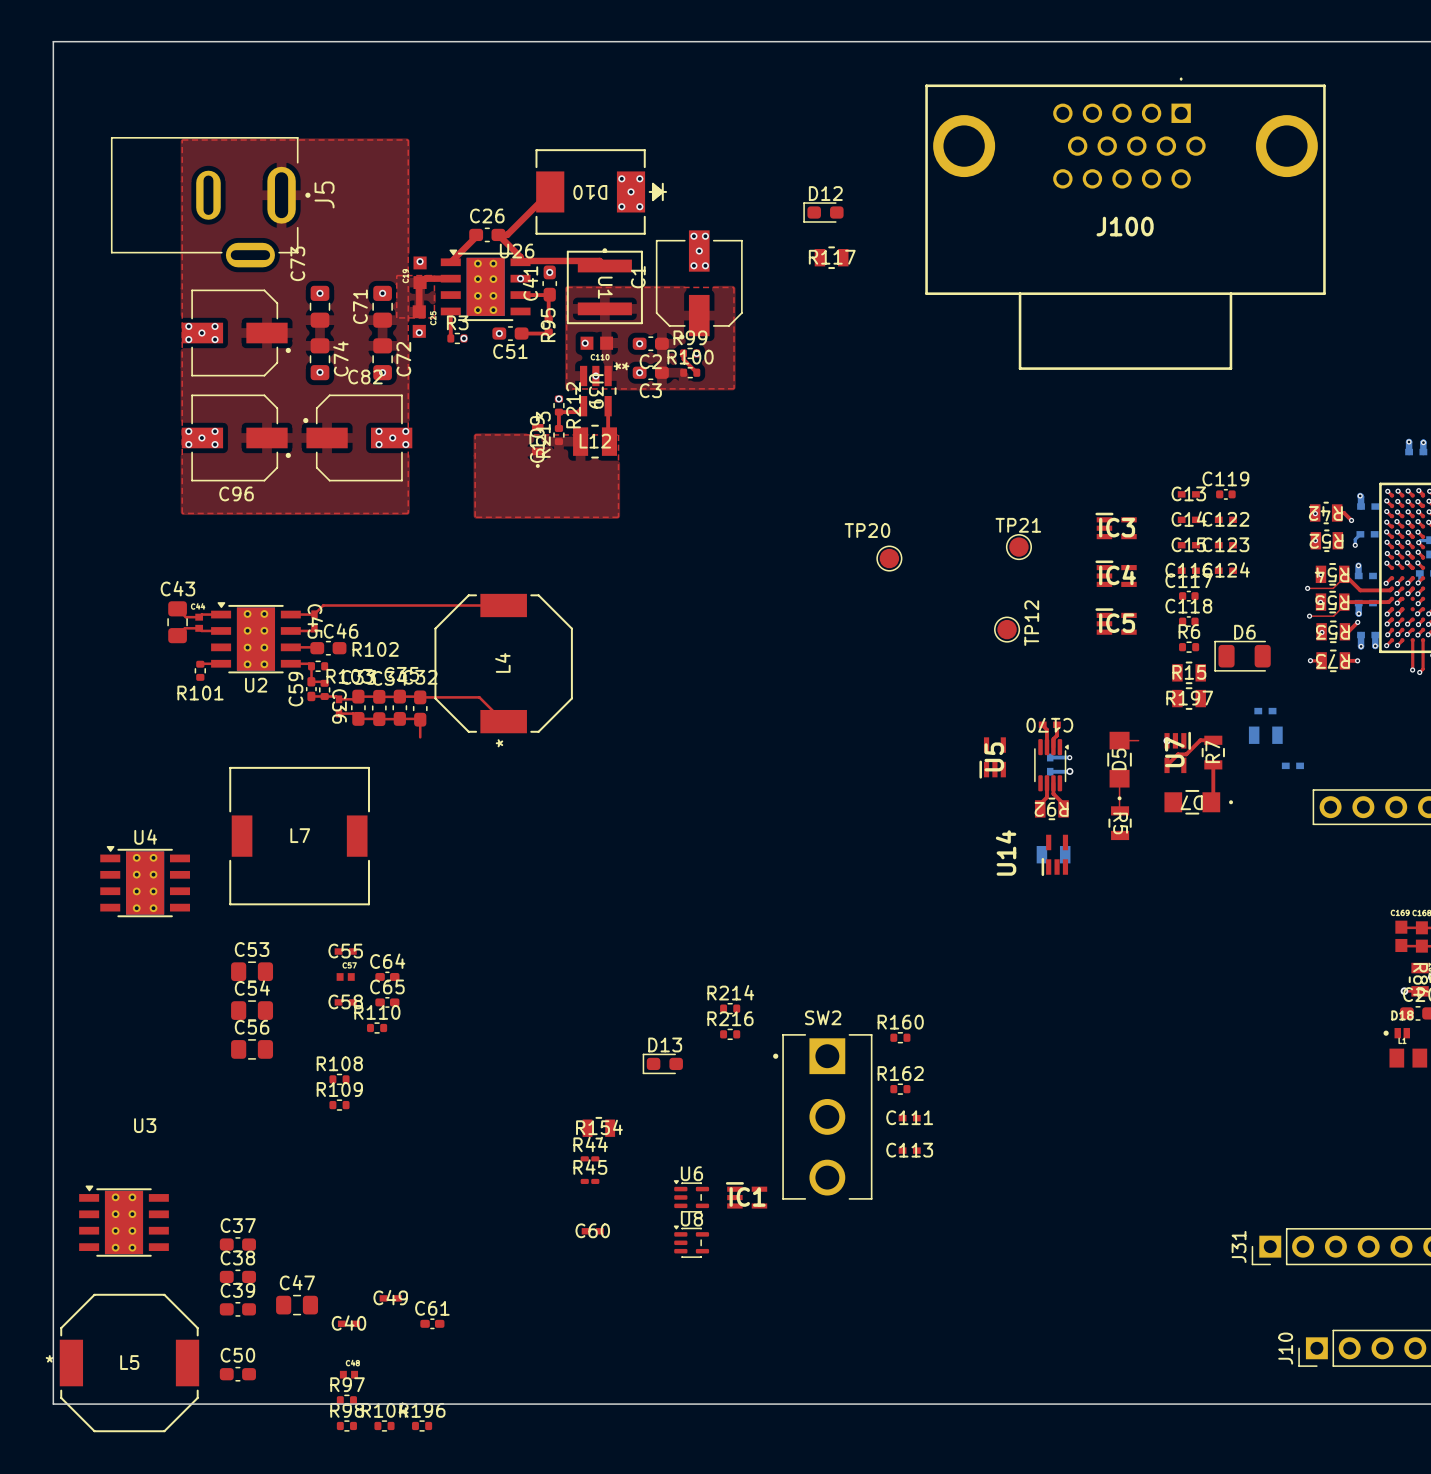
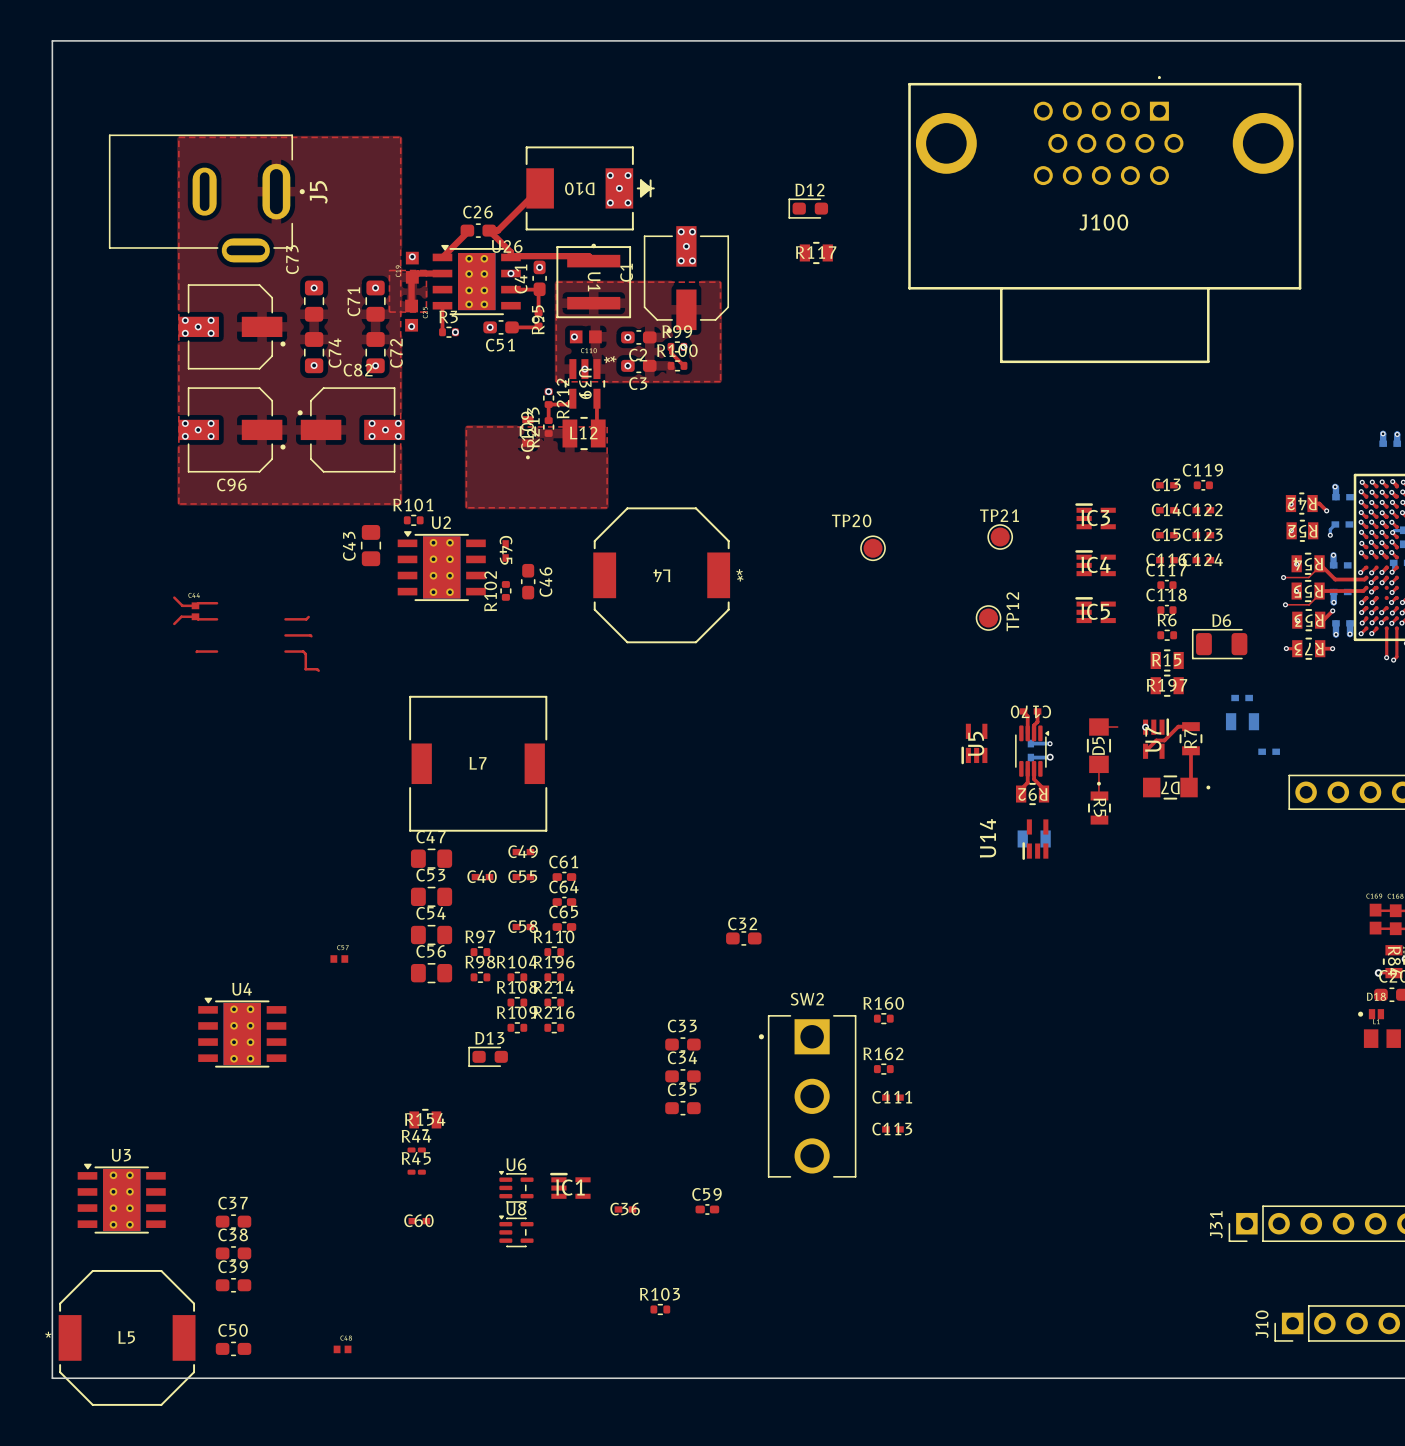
C43 name rotation: 0° (177, 588) -> 90° counterclockwise (349, 546)
top track: (503, 605) (323, 605) (314, 614) (290, 614) -> none
C45 position: (314, 621) -> (505, 550)
C43 position: (177, 622) -> (371, 545)
U2 position: (255, 637) -> (441, 566)
C46 rotation: 0° (328, 648) -> 90° clockwise (528, 581)
C46 position: (328, 648) -> (528, 581)
R102 name position: R102 (375, 649) -> R102 (490, 591)
L4 rotation: 0° (503, 663) -> 90° counterclockwise (661, 575)
L4 position: (503, 663) -> (661, 575)
R102 rotation: 0° (318, 666) -> 90° clockwise (505, 590)
R102 position: (318, 666) -> (505, 590)
R101 rotation: 0° (200, 670) -> 90° clockwise (413, 520)
R101 position: (200, 670) -> (413, 520)
U2 name position: U2 (256, 685) -> U2 (441, 522)
C59 rotation: 0° (311, 689) -> 90° clockwise (707, 1209)
C59 position: (311, 689) -> (707, 1209)
R103 rotation: 0° (324, 689) -> 90° clockwise (660, 1309)
R103 position: (324, 689) -> (660, 1309)
R101 name position: R101 (200, 693) -> R101 (413, 505)
top track: (311, 696) (336, 696) (339, 699) (355, 699) (358, 696) (479, 697) (503, 721) -> none
C36 rotation: 0° (339, 706) -> 90° clockwise (625, 1209)
C36 position: (339, 706) -> (625, 1209)
C33 rotation: 0° (358, 707) -> 90° clockwise (682, 1044)
C33 position: (358, 707) -> (682, 1044)
C34 rotation: 0° (379, 707) -> 90° clockwise (682, 1076)
C34 position: (379, 707) -> (682, 1076)
C35 rotation: 0° (399, 707) -> 90° clockwise (682, 1108)
C35 position: (399, 707) -> (682, 1108)
C32 rotation: 0° (420, 708) -> 90° clockwise (743, 938)
C32 position: (420, 708) -> (743, 938)
top track: (339, 713) (353, 713) (358, 718) (419, 718) (420, 737) -> none
L7 position: (299, 836) -> (478, 763)
U4 position: (145, 881) -> (242, 1032)
C55 position: (345, 951) -> (523, 877)
C53 position: (252, 971) -> (431, 896)
C64 position: (387, 976) -> (564, 902)
C58 position: (345, 1002) -> (523, 927)
C65 position: (387, 1002) -> (564, 927)
R214 position: (730, 1008) -> (554, 1002)
C54 position: (252, 1010) -> (431, 935)
R110 position: (377, 1027) -> (554, 952)
R216 position: (730, 1034) -> (554, 1027)
C56 position: (252, 1049) -> (431, 973)
D13 position: (662, 1063) -> (488, 1056)
R108 position: (339, 1079) -> (517, 1002)
R109 position: (339, 1105) -> (517, 1027)
U3 name position: U3 (145, 1125) -> U3 (121, 1155)
R154 position: (598, 1128) -> (425, 1119)
R44 position: (590, 1158) -> (416, 1150)
R45 position: (590, 1181) -> (416, 1172)
IC1 position: (746, 1195) -> (570, 1185)
U6 position: (691, 1196) -> (516, 1186)
C60 position: (592, 1231) -> (419, 1221)
U8 position: (691, 1241) -> (516, 1231)
C49 position: (390, 1298) -> (523, 852)
C47 position: (297, 1305) -> (431, 858)
C40 position: (348, 1323) -> (482, 877)
C61 position: (432, 1323) -> (564, 877)
R97 position: (346, 1400) -> (480, 952)
R98 position: (346, 1425) -> (480, 977)
R104 position: (384, 1425) -> (517, 977)
R196 position: (422, 1425) -> (554, 977)

